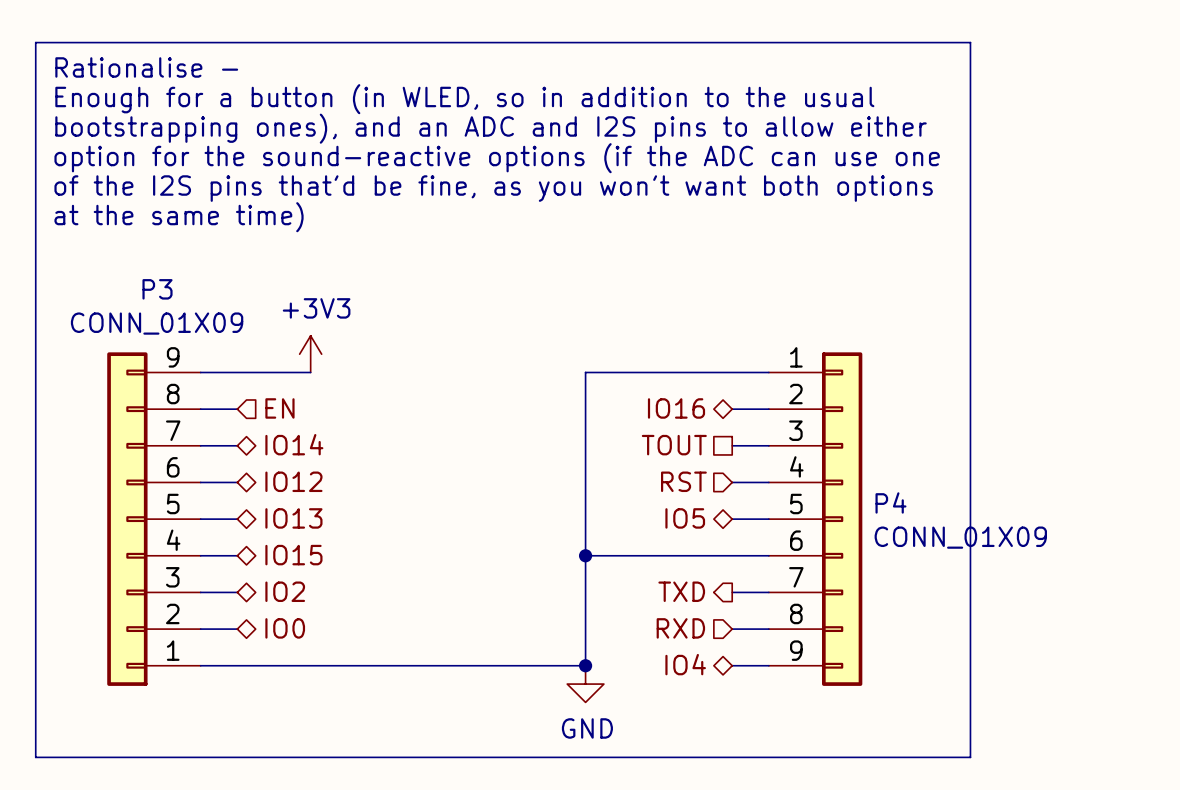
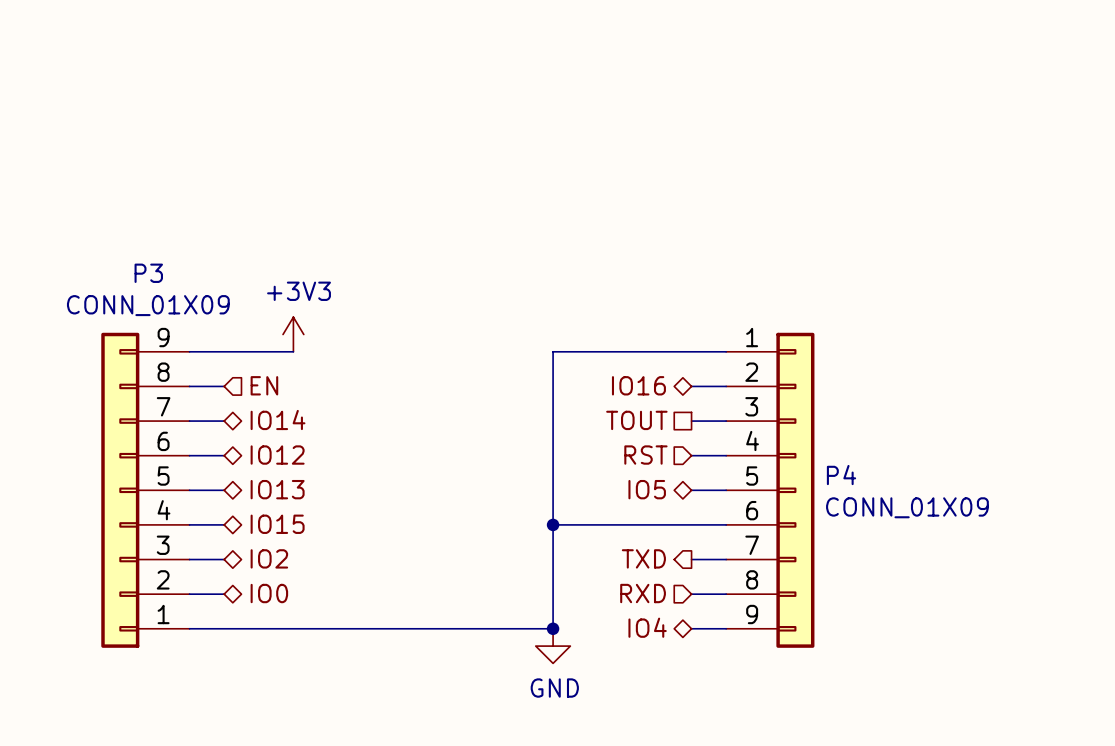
line: (35, 42) (970, 42) (970, 757) (35, 757) (35, 42) -> none
text: Rationalise - (146, 67) -> none
text: Enough for a button (in WLED, so in addition to the usual (464, 99) -> none
text: bootstrapping ones), and an ADC and I2S pins to allow either (491, 128) -> none
text: option for the sound-reactive options (if the ADC can use one (497, 158) -> none
text: of the I2S pins that'd be fine, as you won't want both options (493, 188) -> none
text: at the same time) (179, 217) -> none

